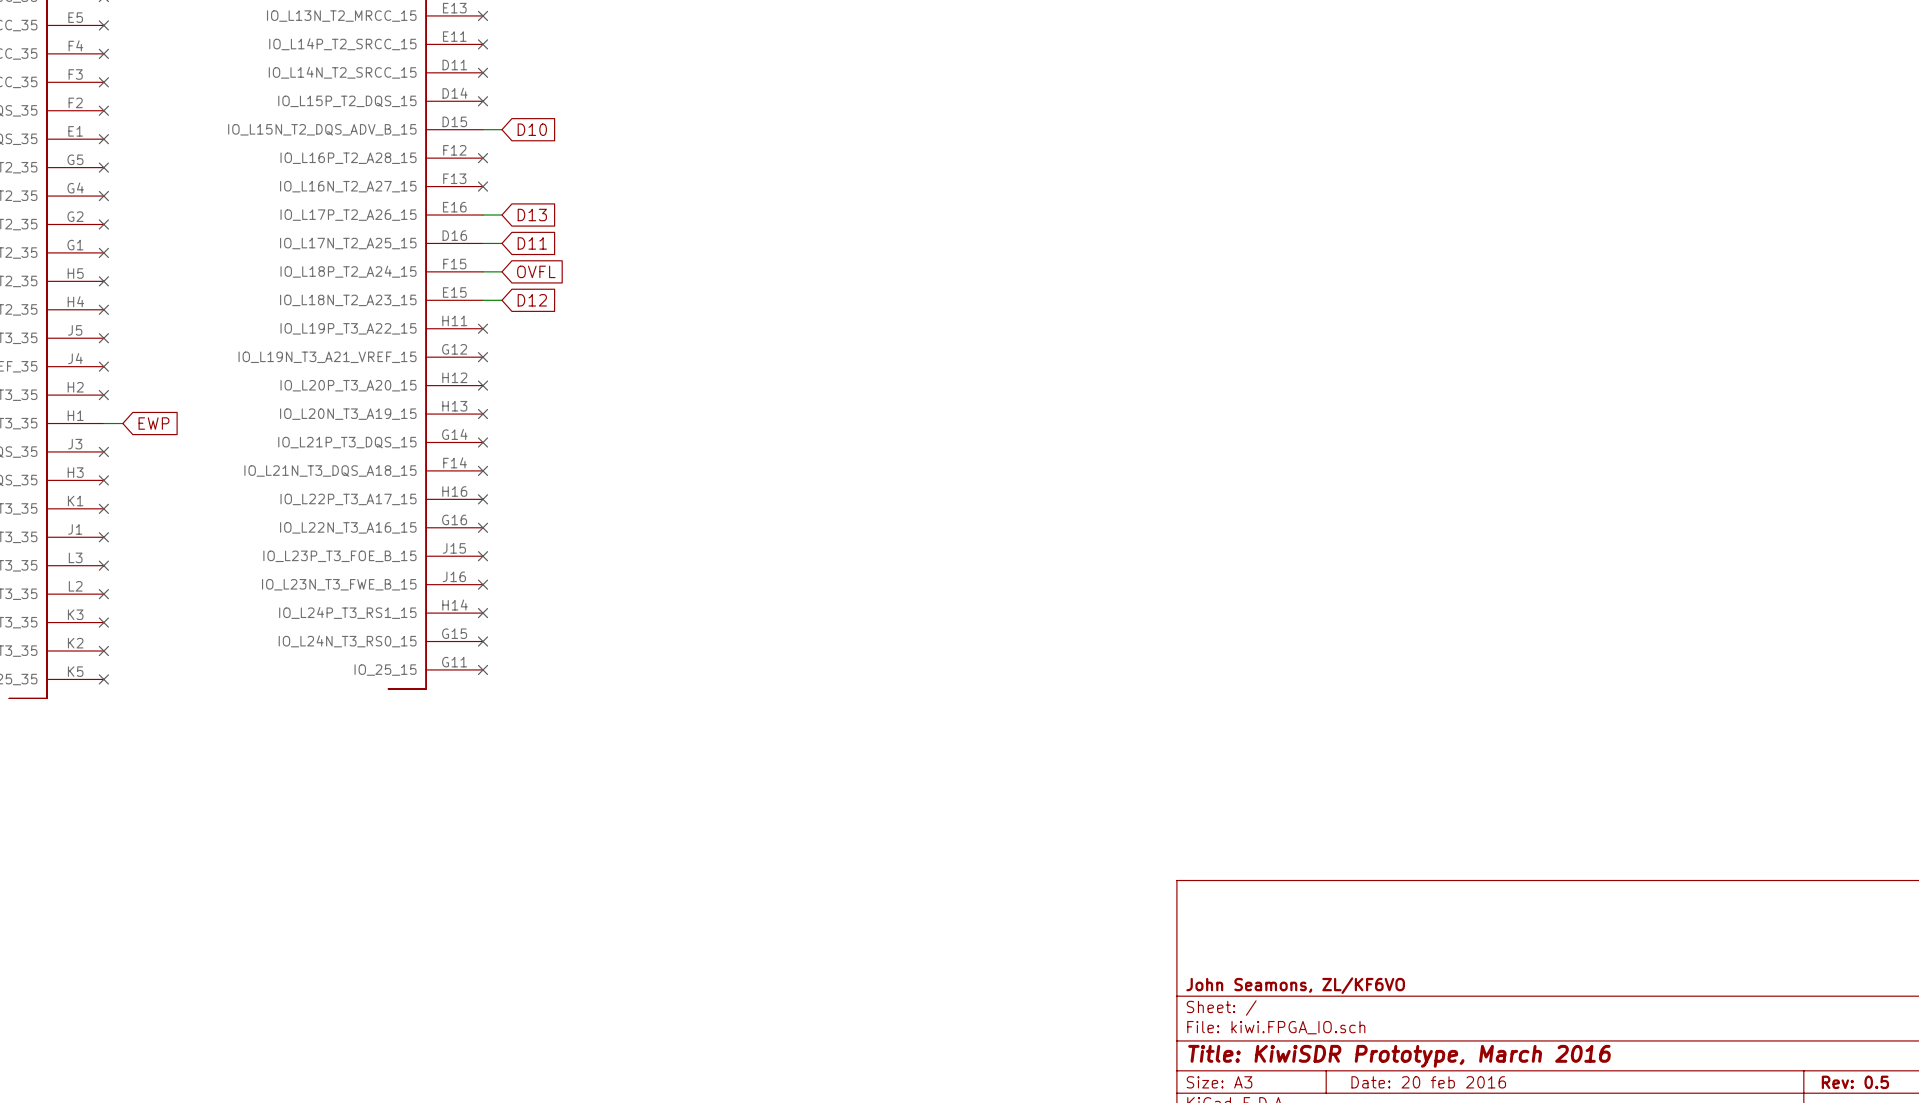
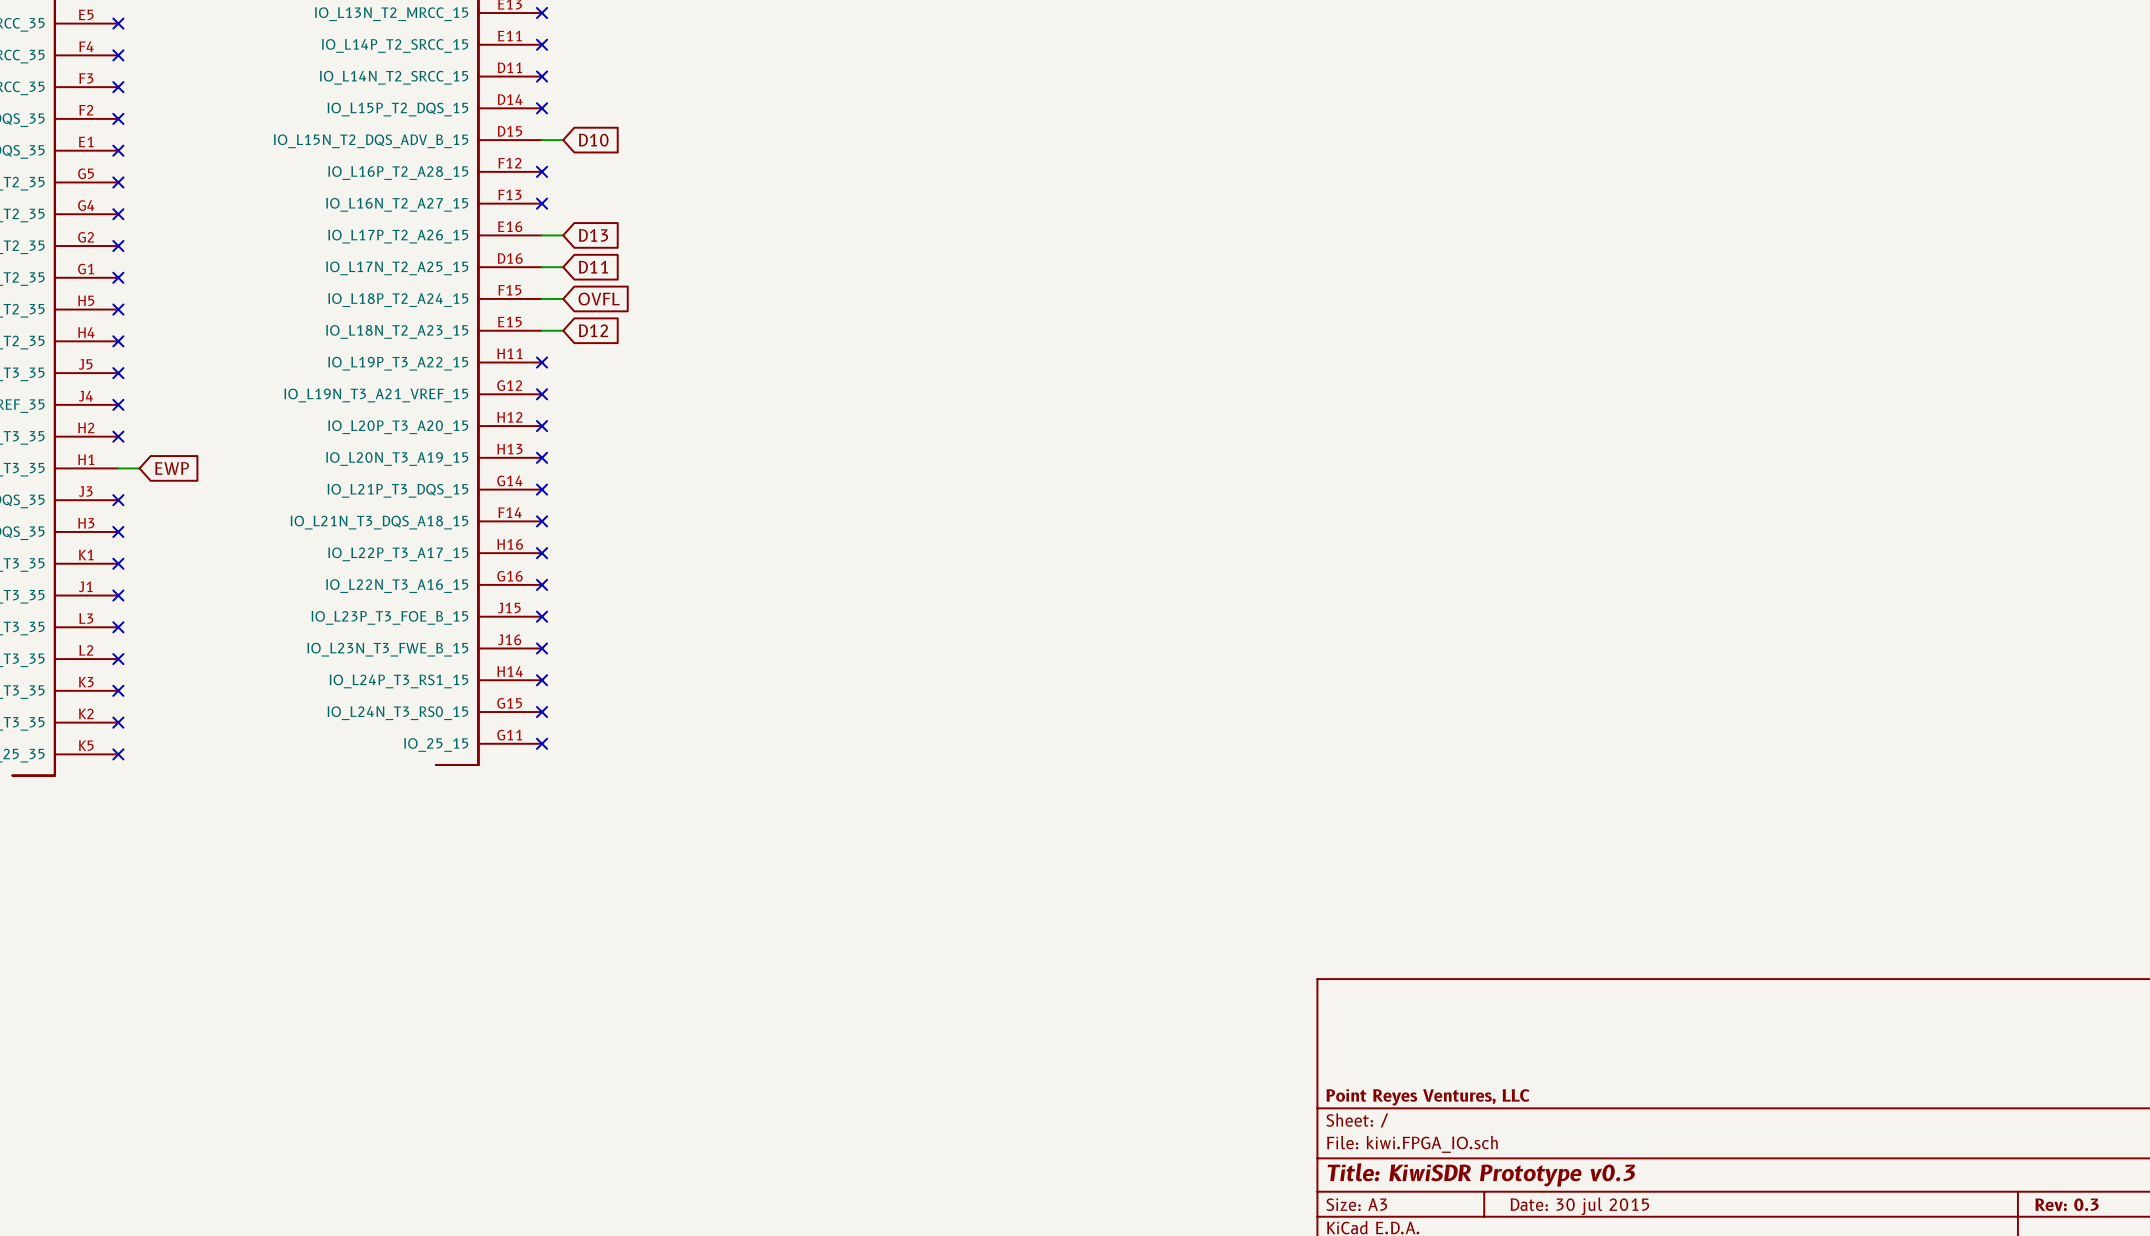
title block: John Seamons, ZL/KF6VO (1295, 985) -> Point Reyes Ventures, LLC (1427, 1097)
title block: Title: KiwiSDR Prototype, March 2016 (1399, 1056) -> Title: KiwiSDR Prototype v0.3 (1481, 1174)
title block: Date: 20 feb 2016 (1428, 1082) -> Date: 30 jul 2015 (1579, 1206)
title block: Rev: 0.5 (1855, 1082) -> Rev: 0.3 (2066, 1204)

